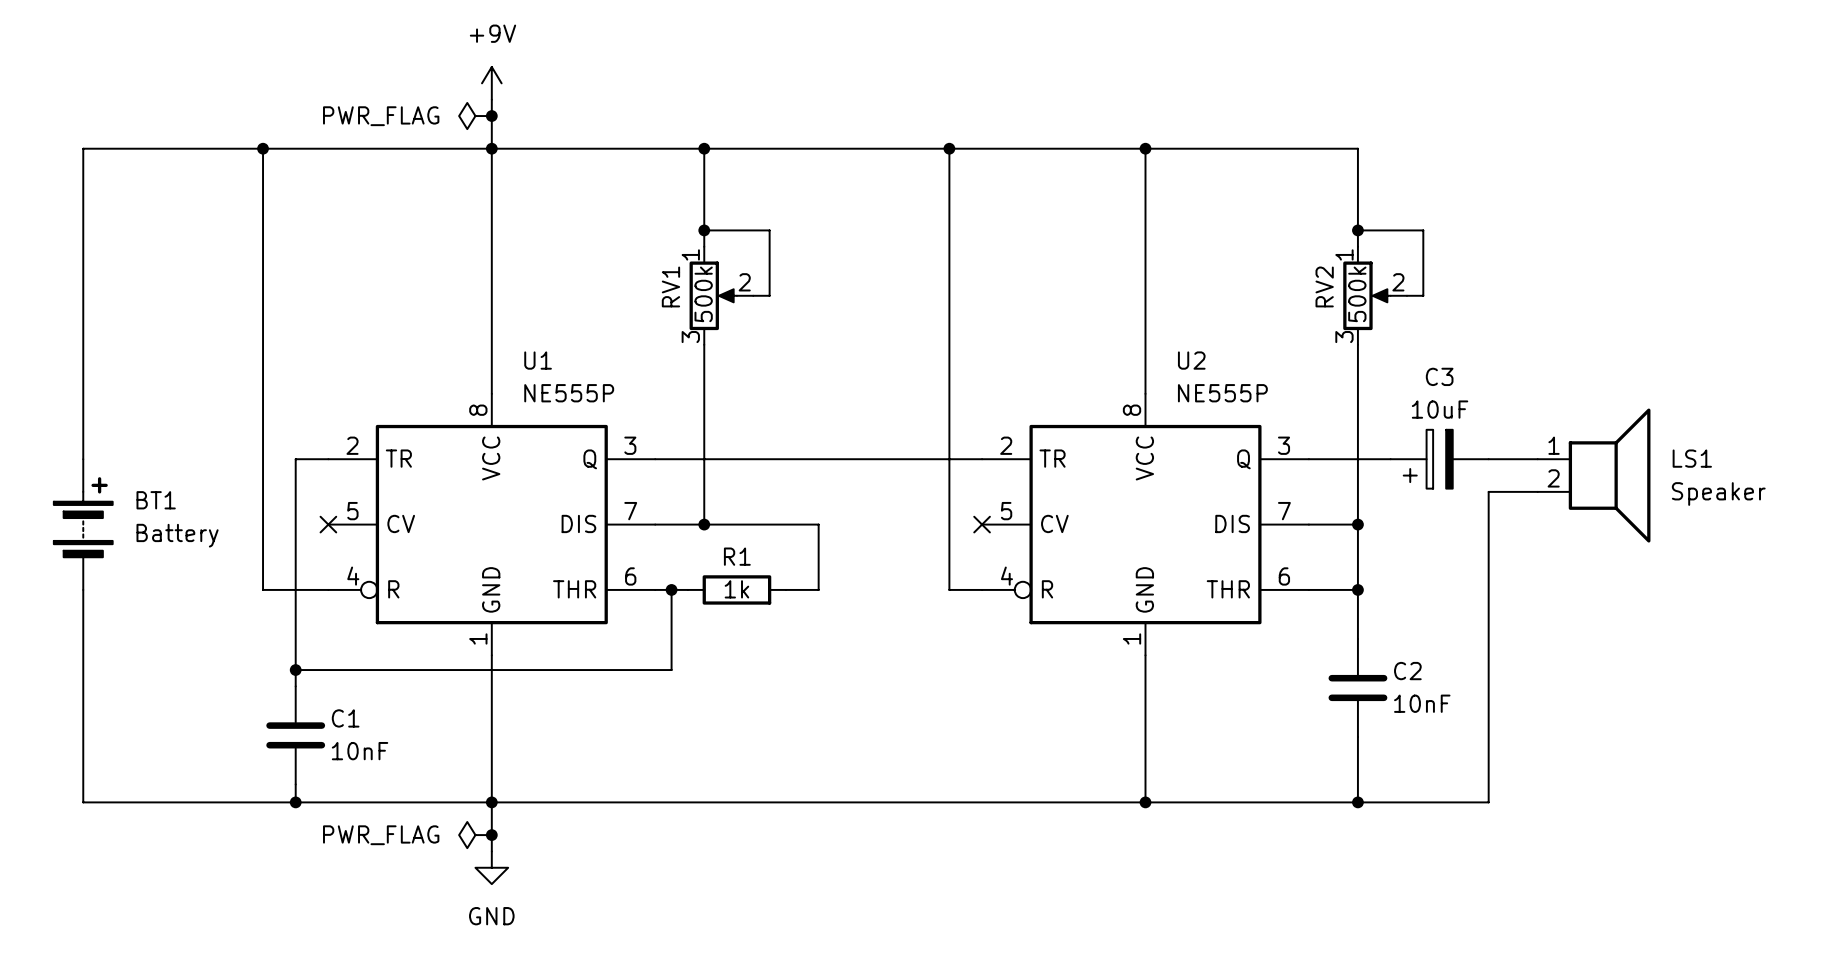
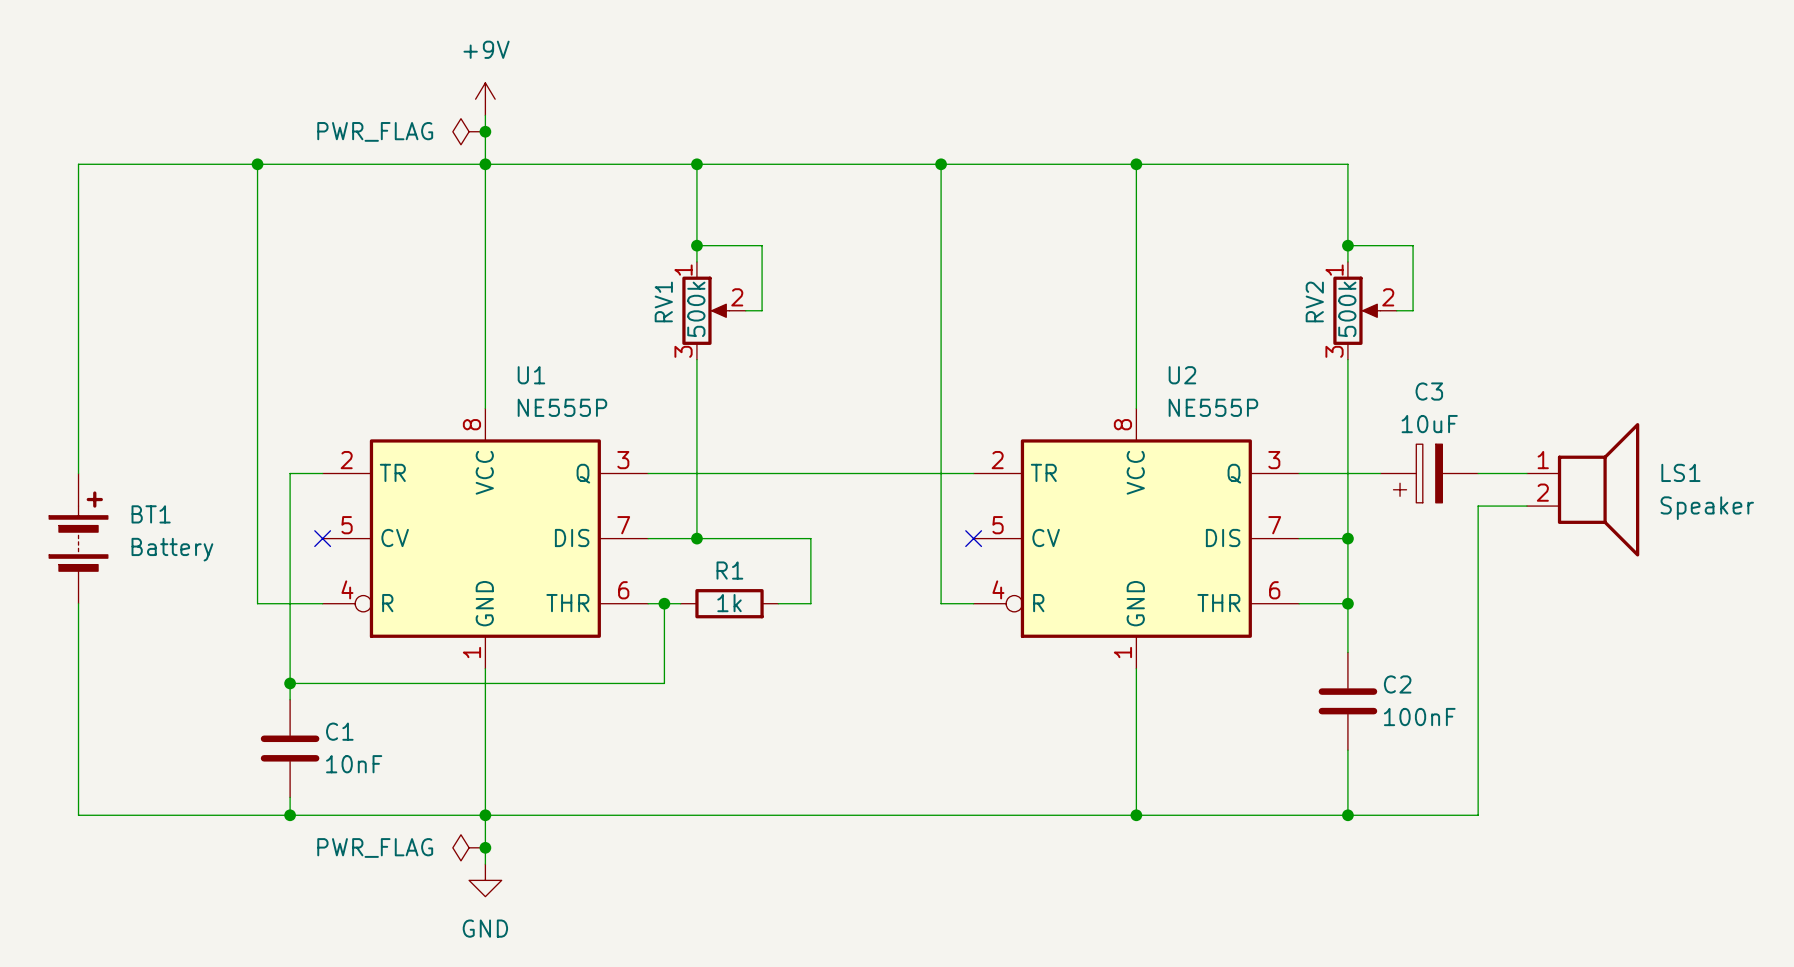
C2 value: 10nF (1422, 703) -> 100nF (1419, 717)

